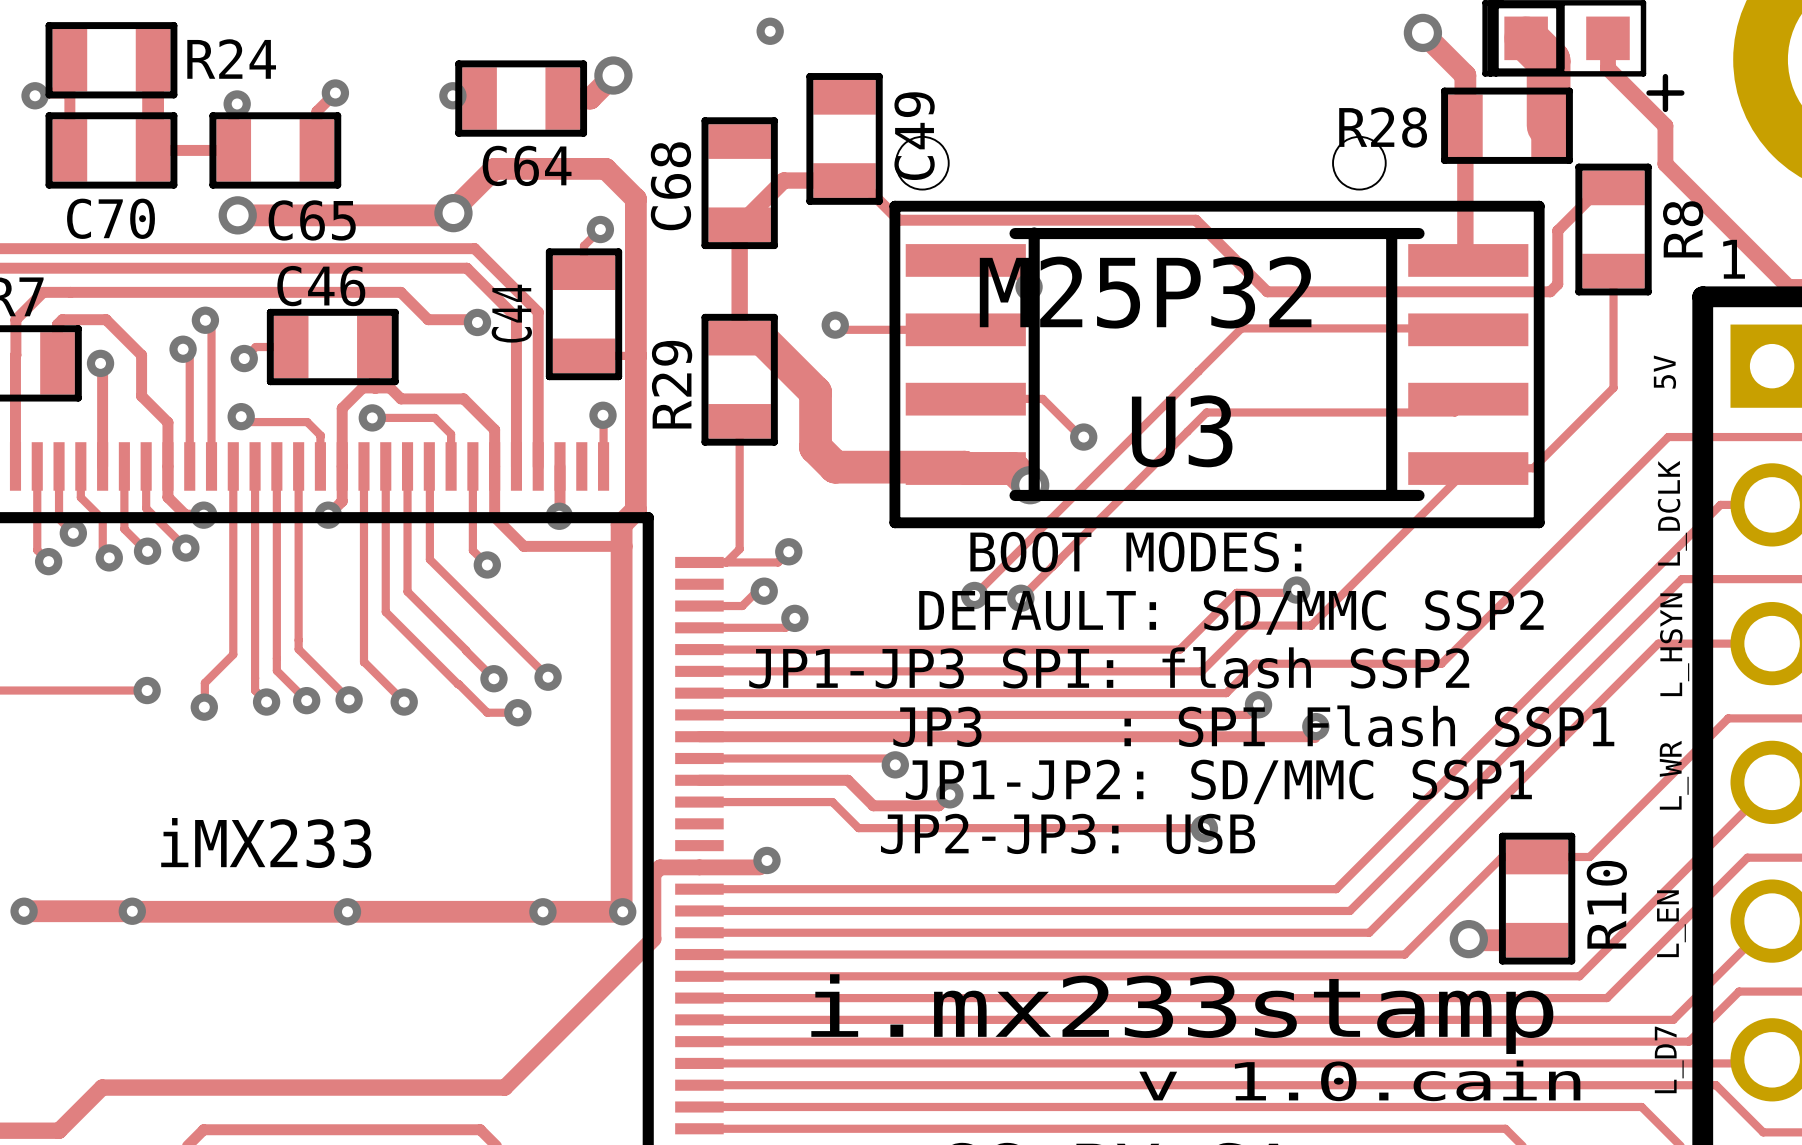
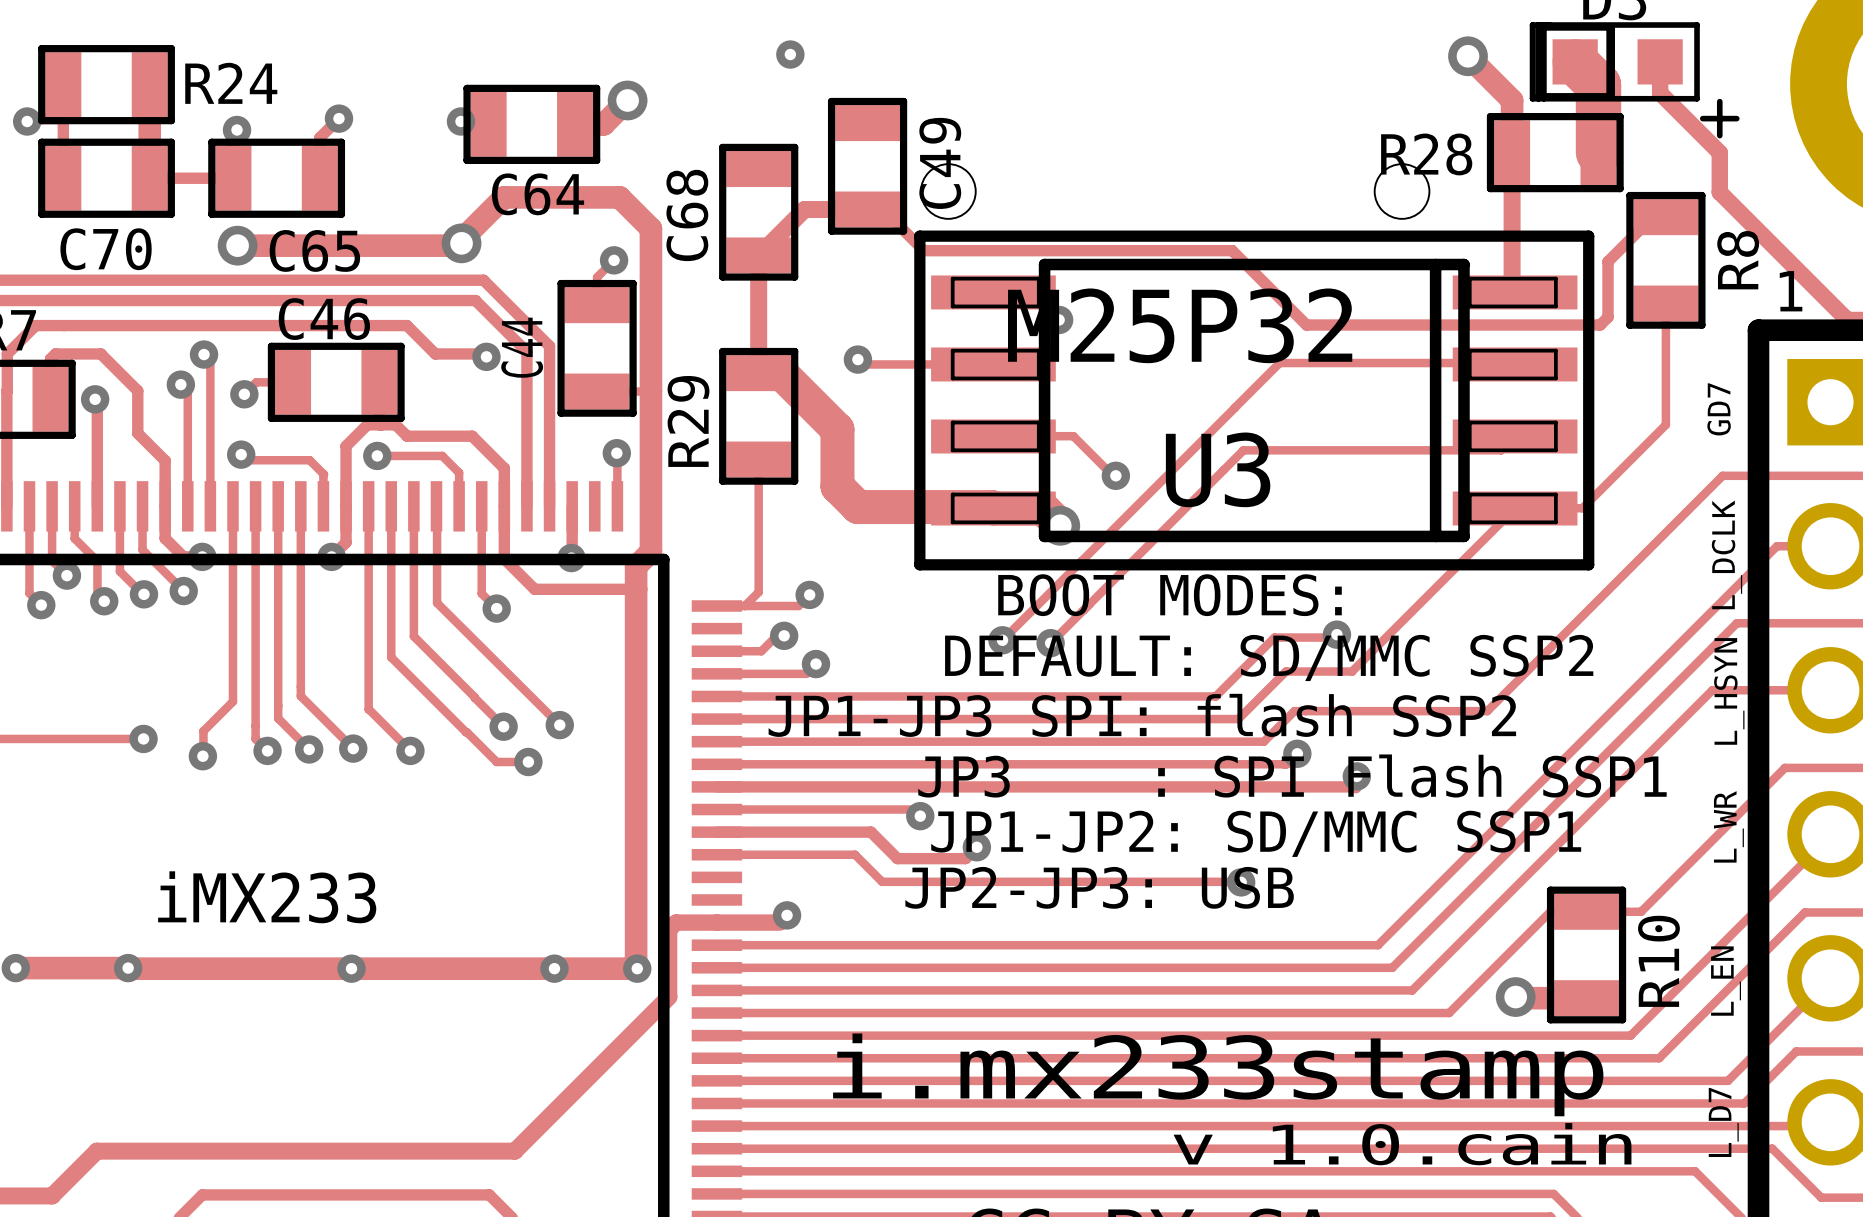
U3 footprint: [889, 200, 1545, 529] -> [914, 230, 1595, 571]
text: 5V (1664, 372) -> GD7 (1719, 409)

